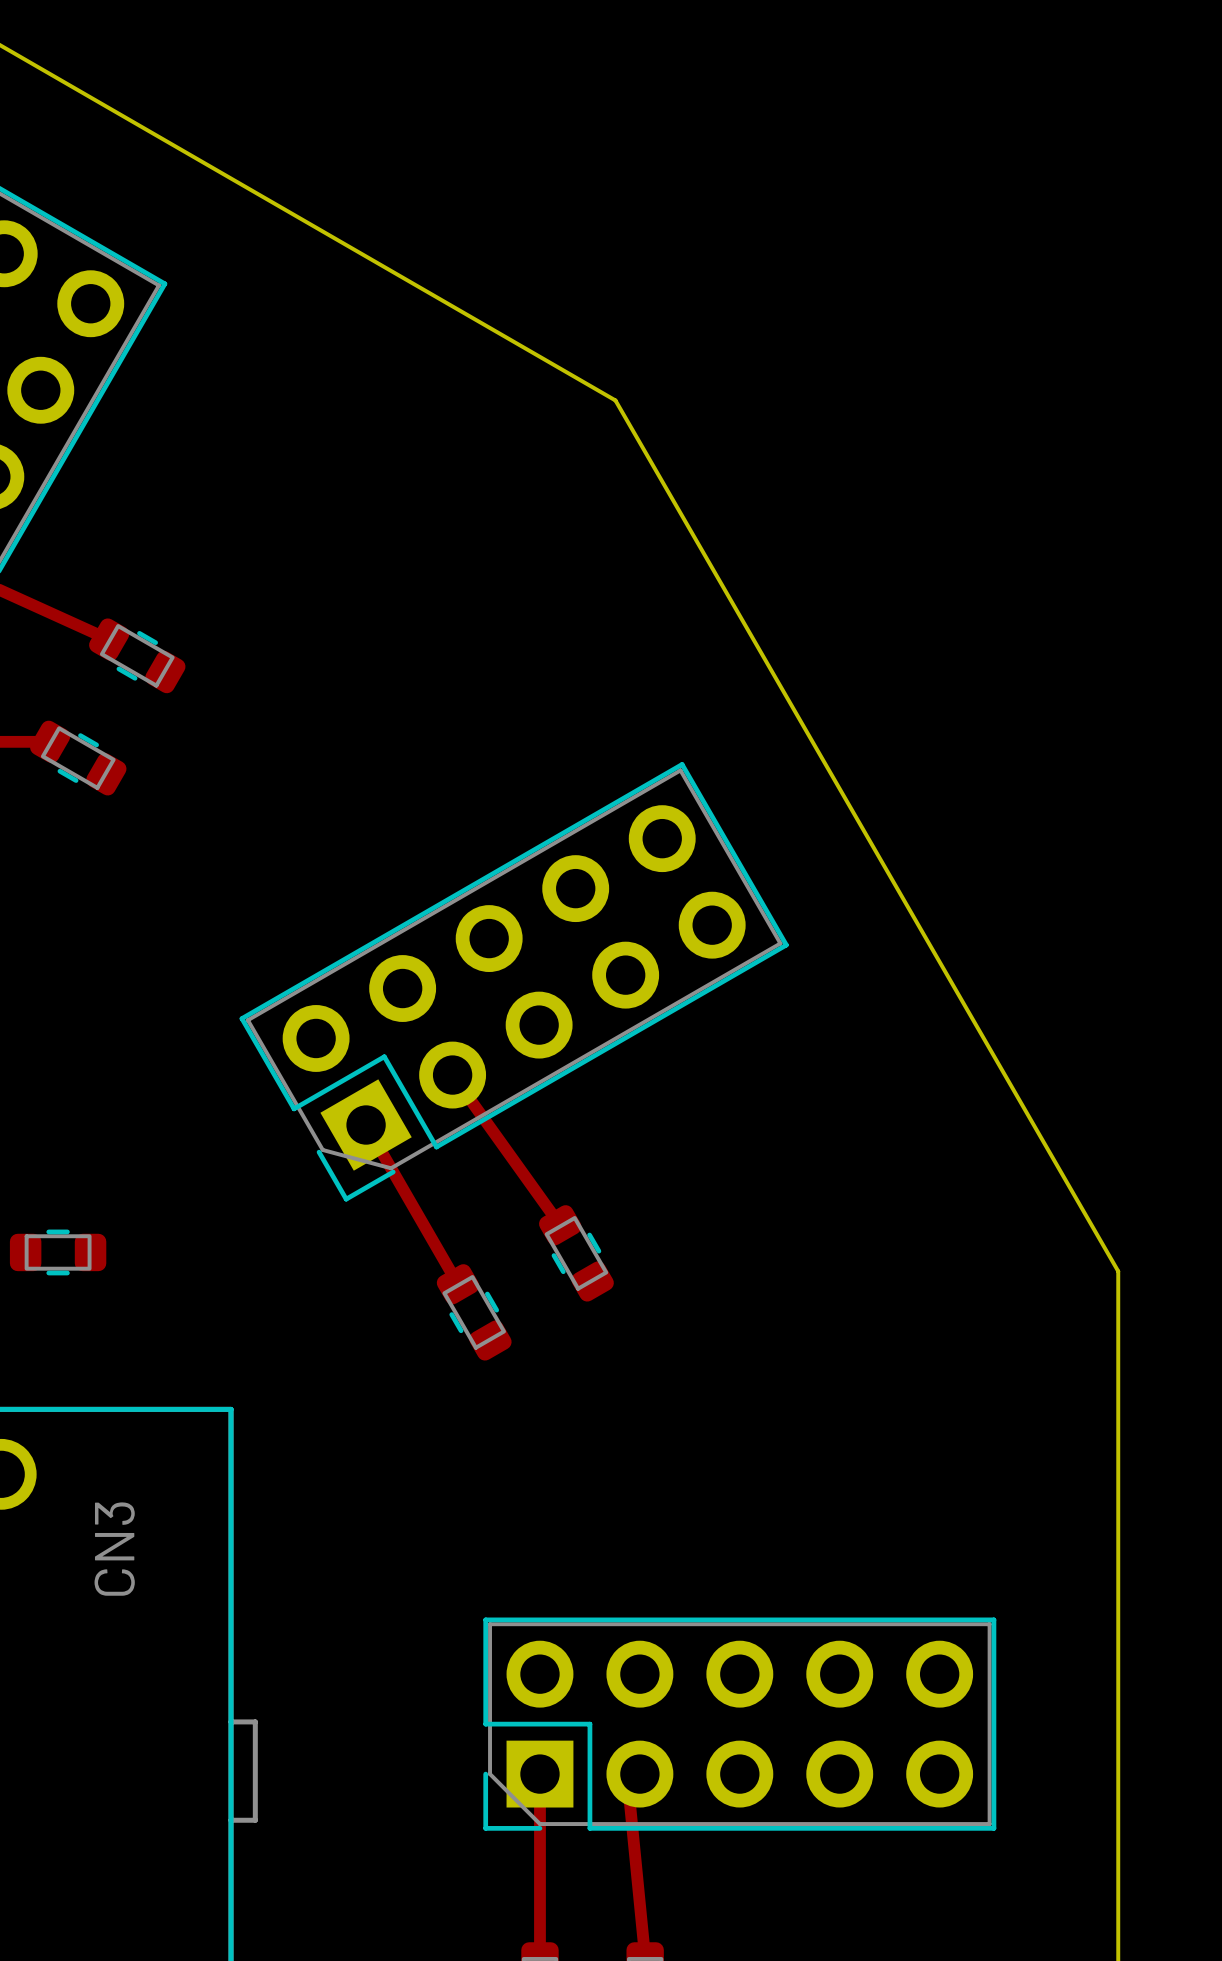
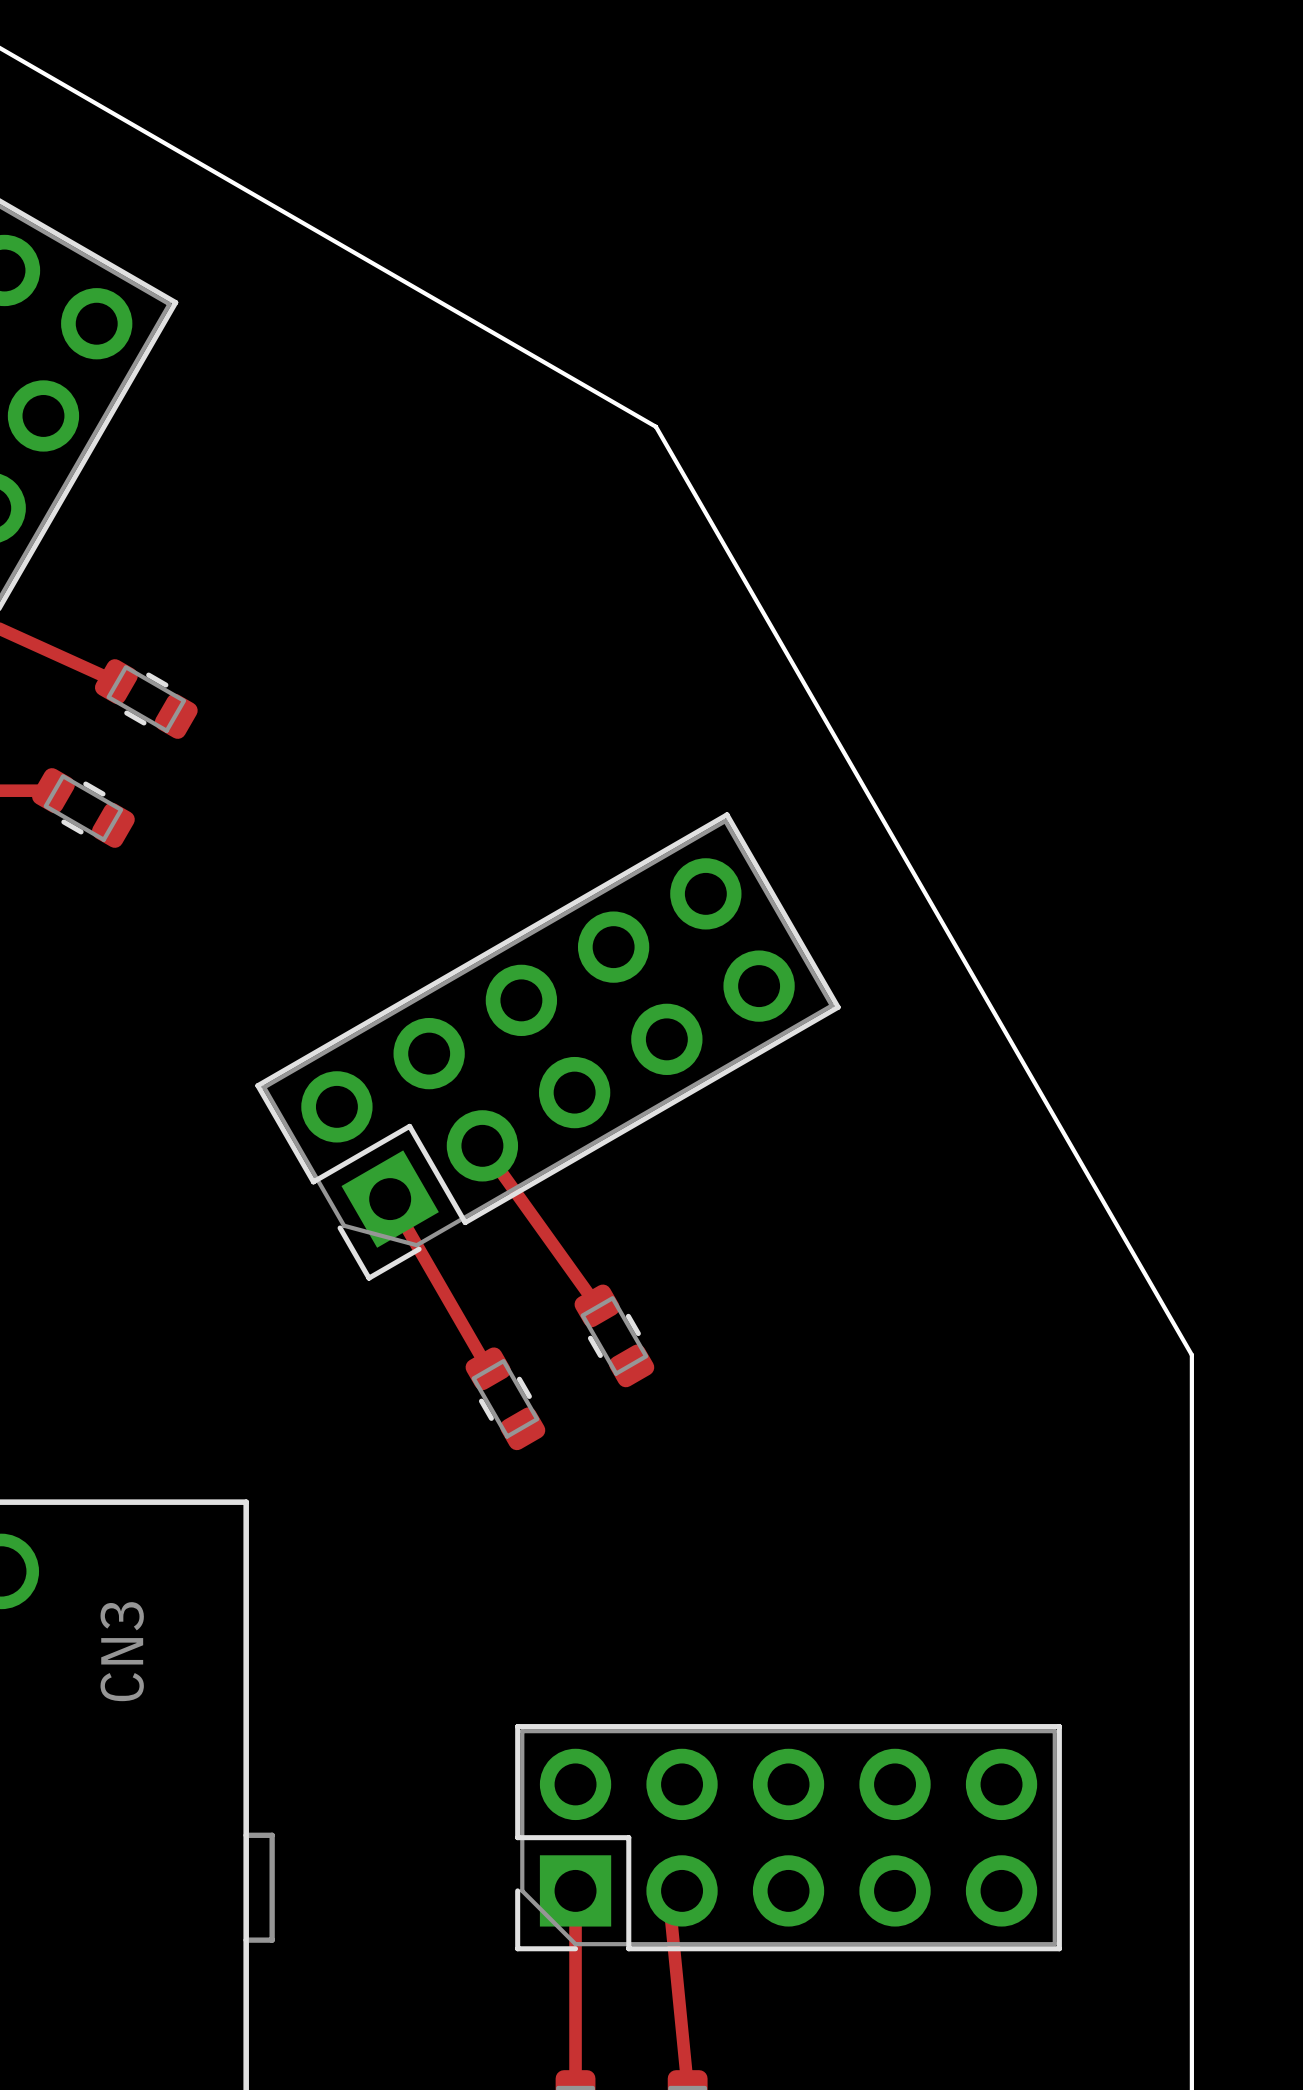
part: (58, 1252) -> none

